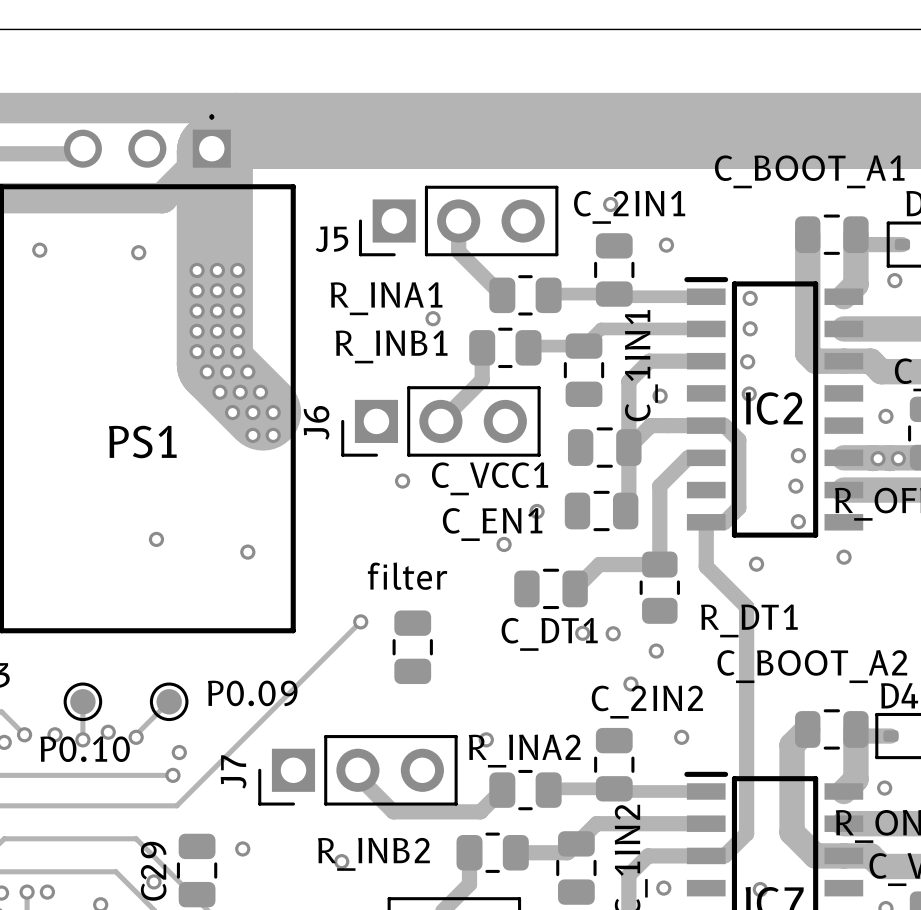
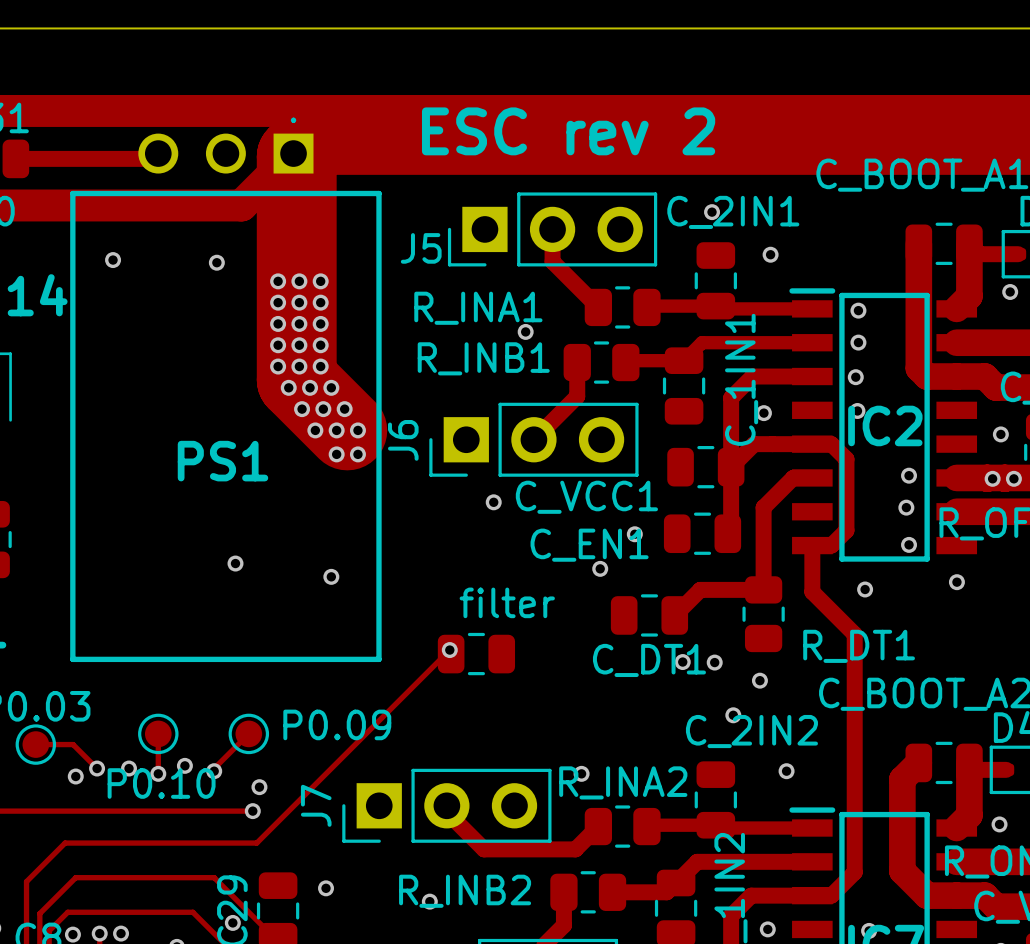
text: none -> ESC rev 2 (568, 131)
part rotation: 0° (412, 647) -> 90° clockwise (476, 654)

